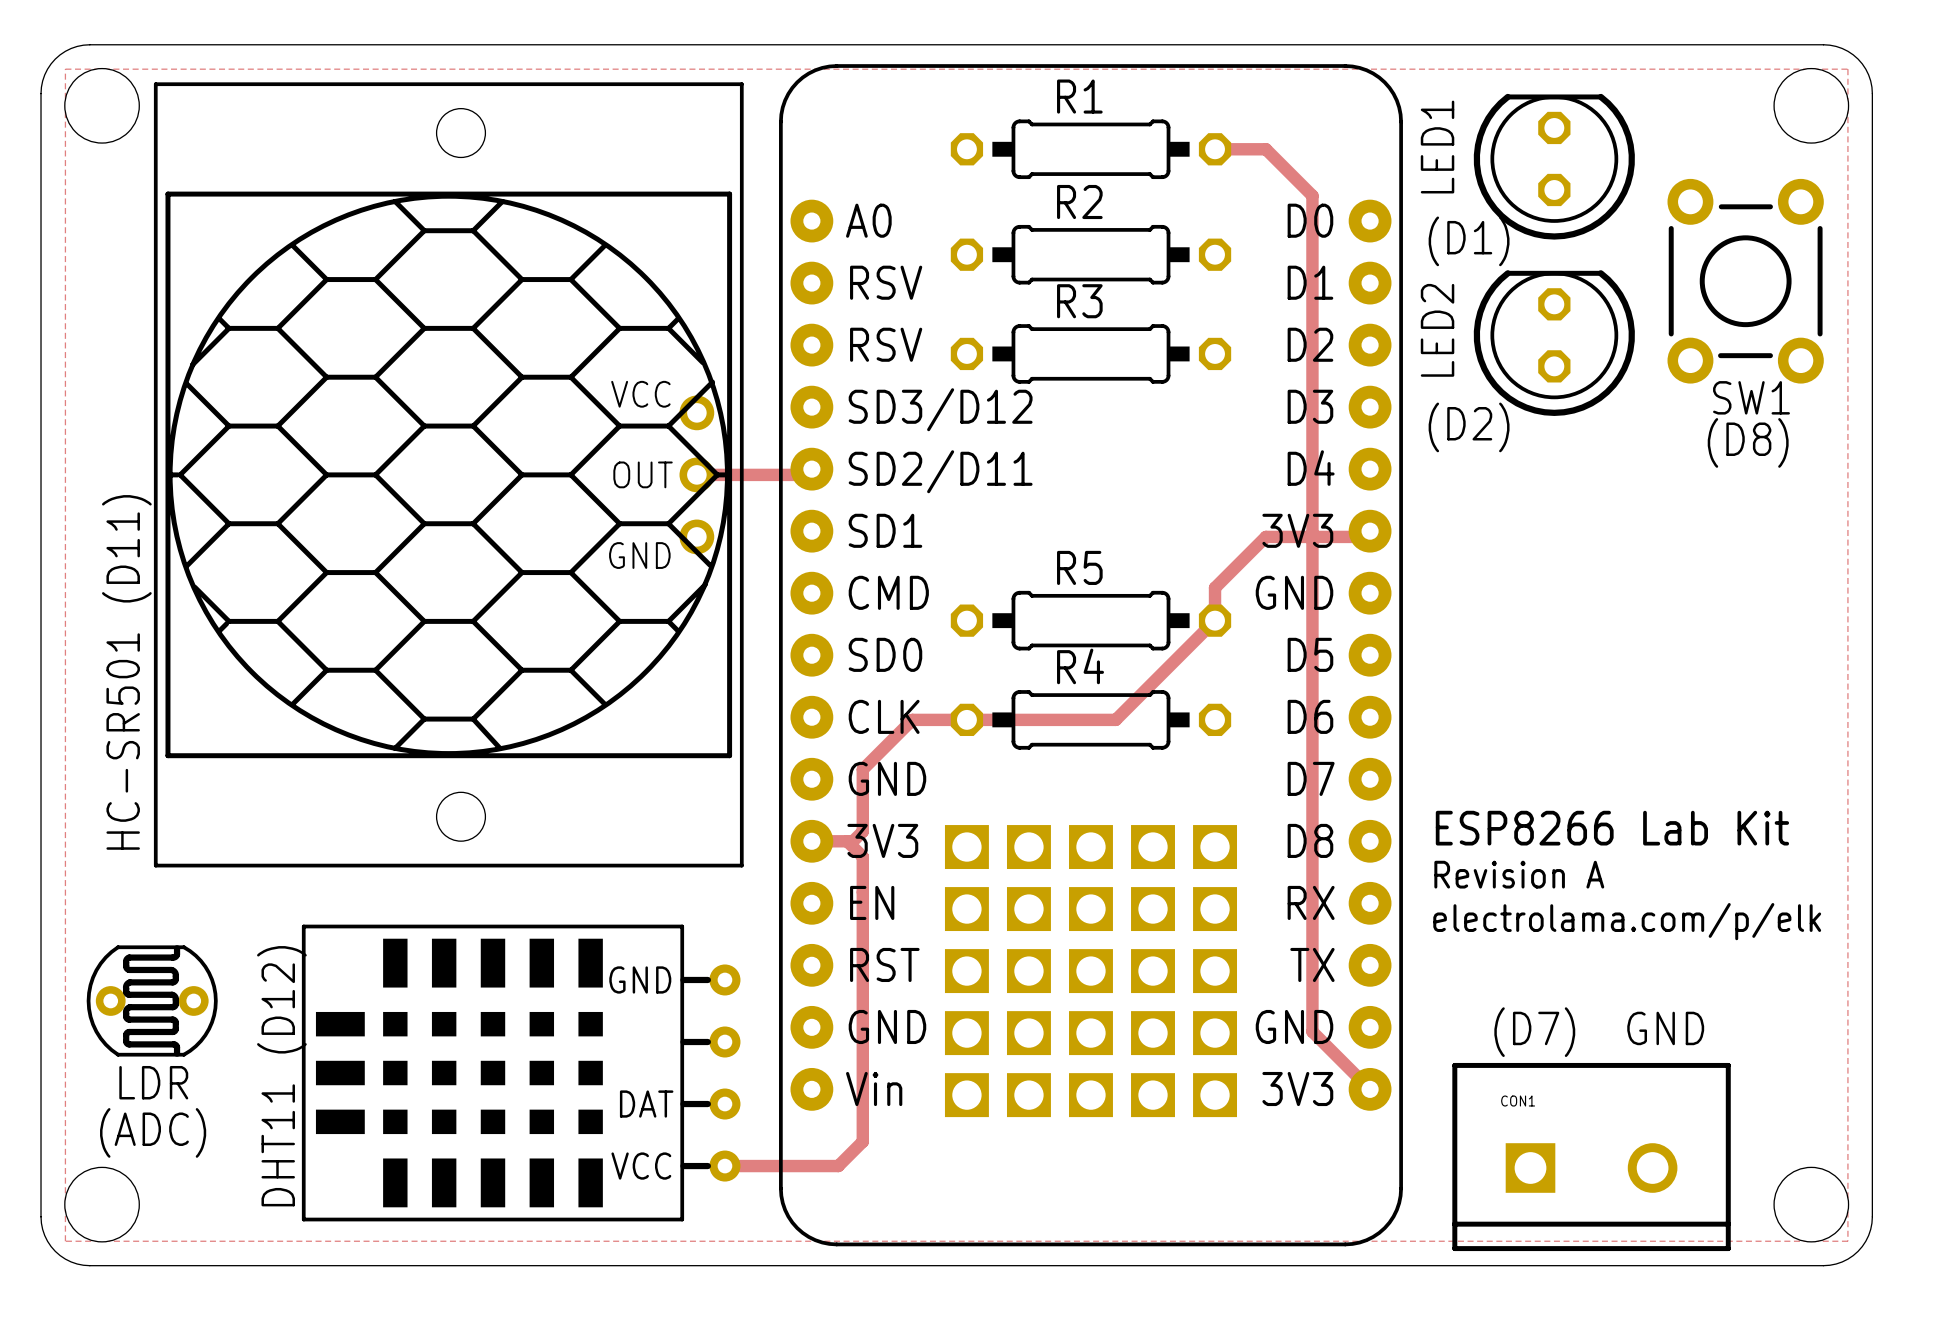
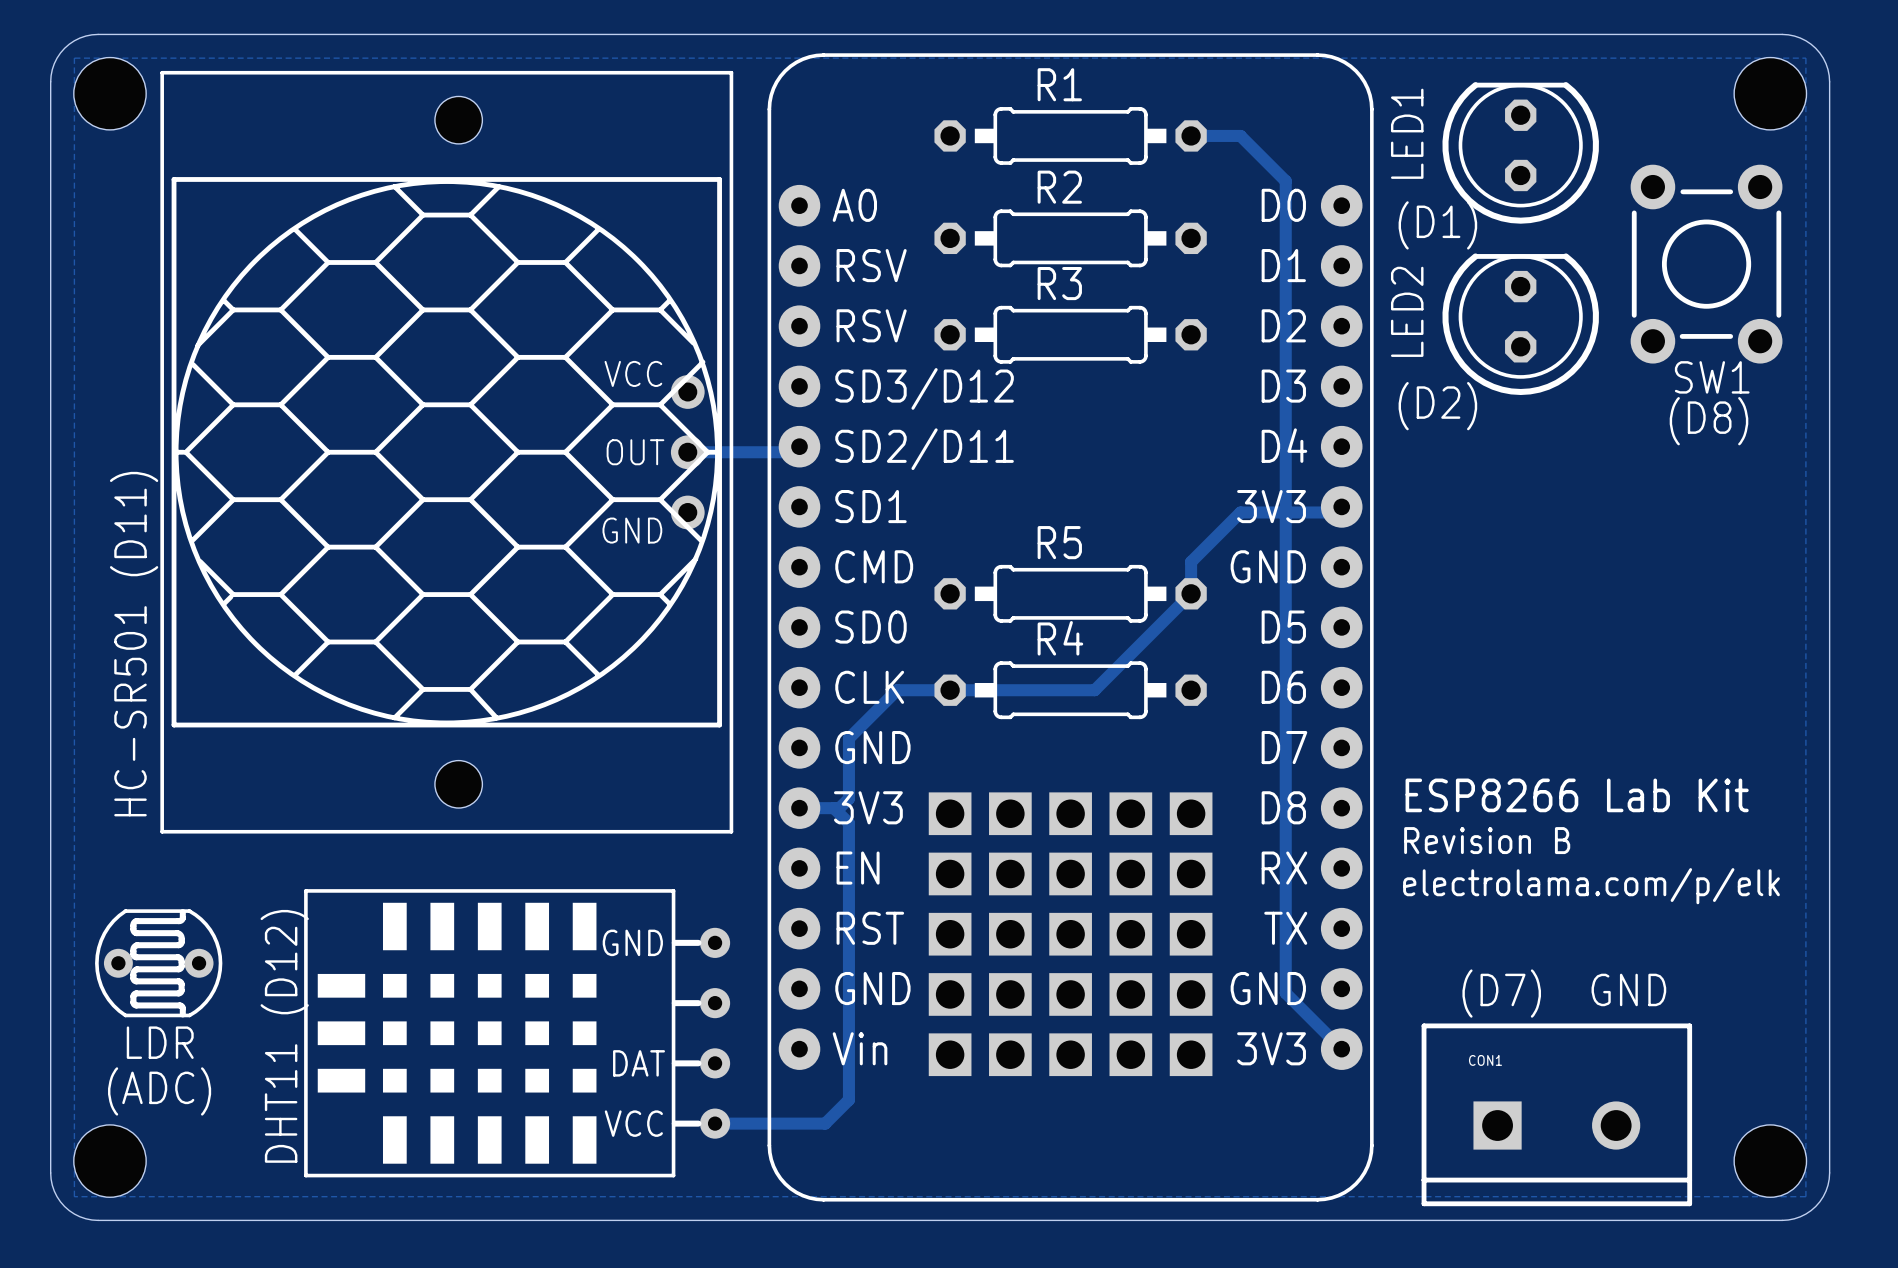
text: Revision A (1519, 874) -> Revision B (1487, 840)

